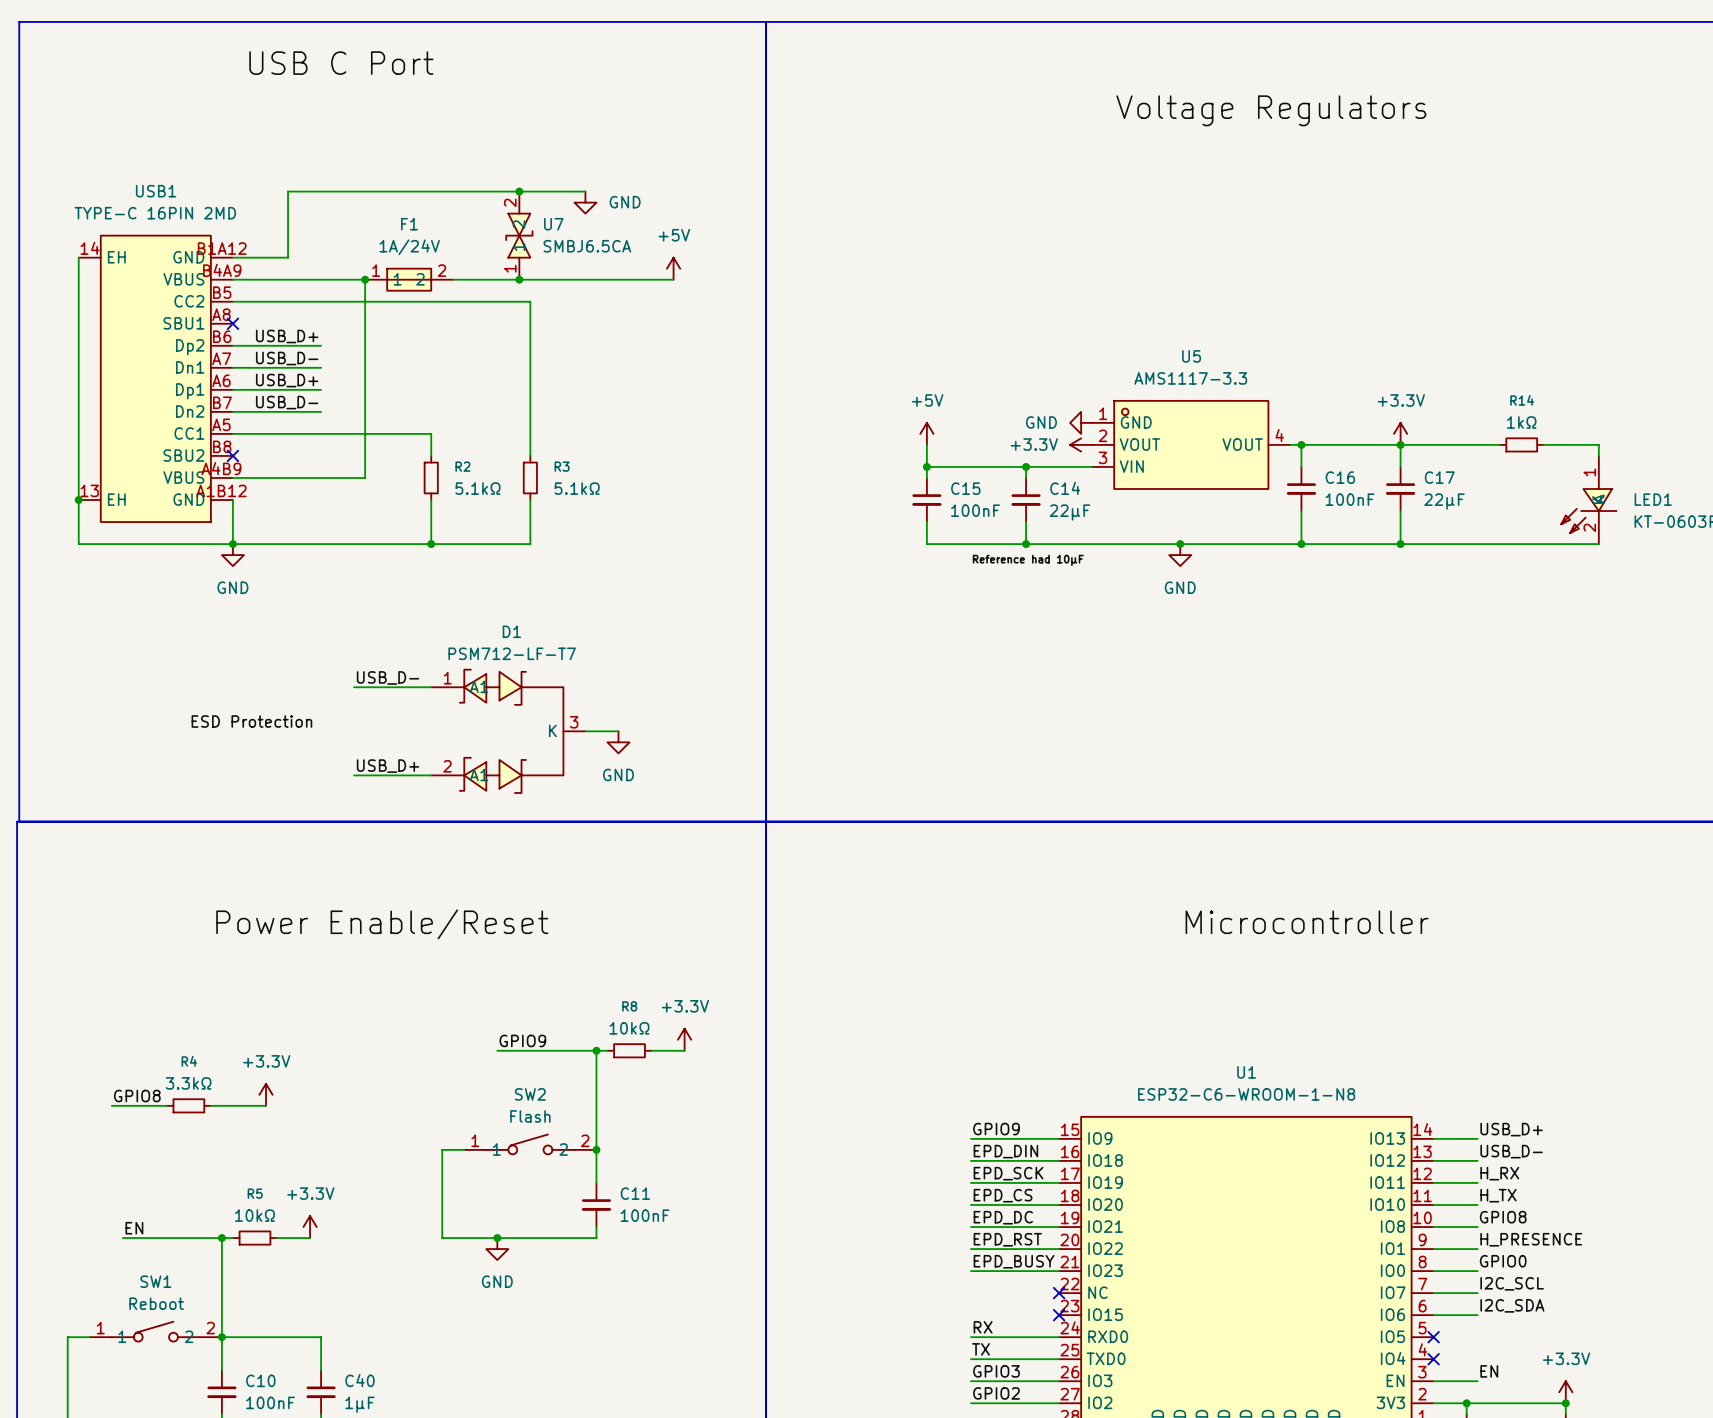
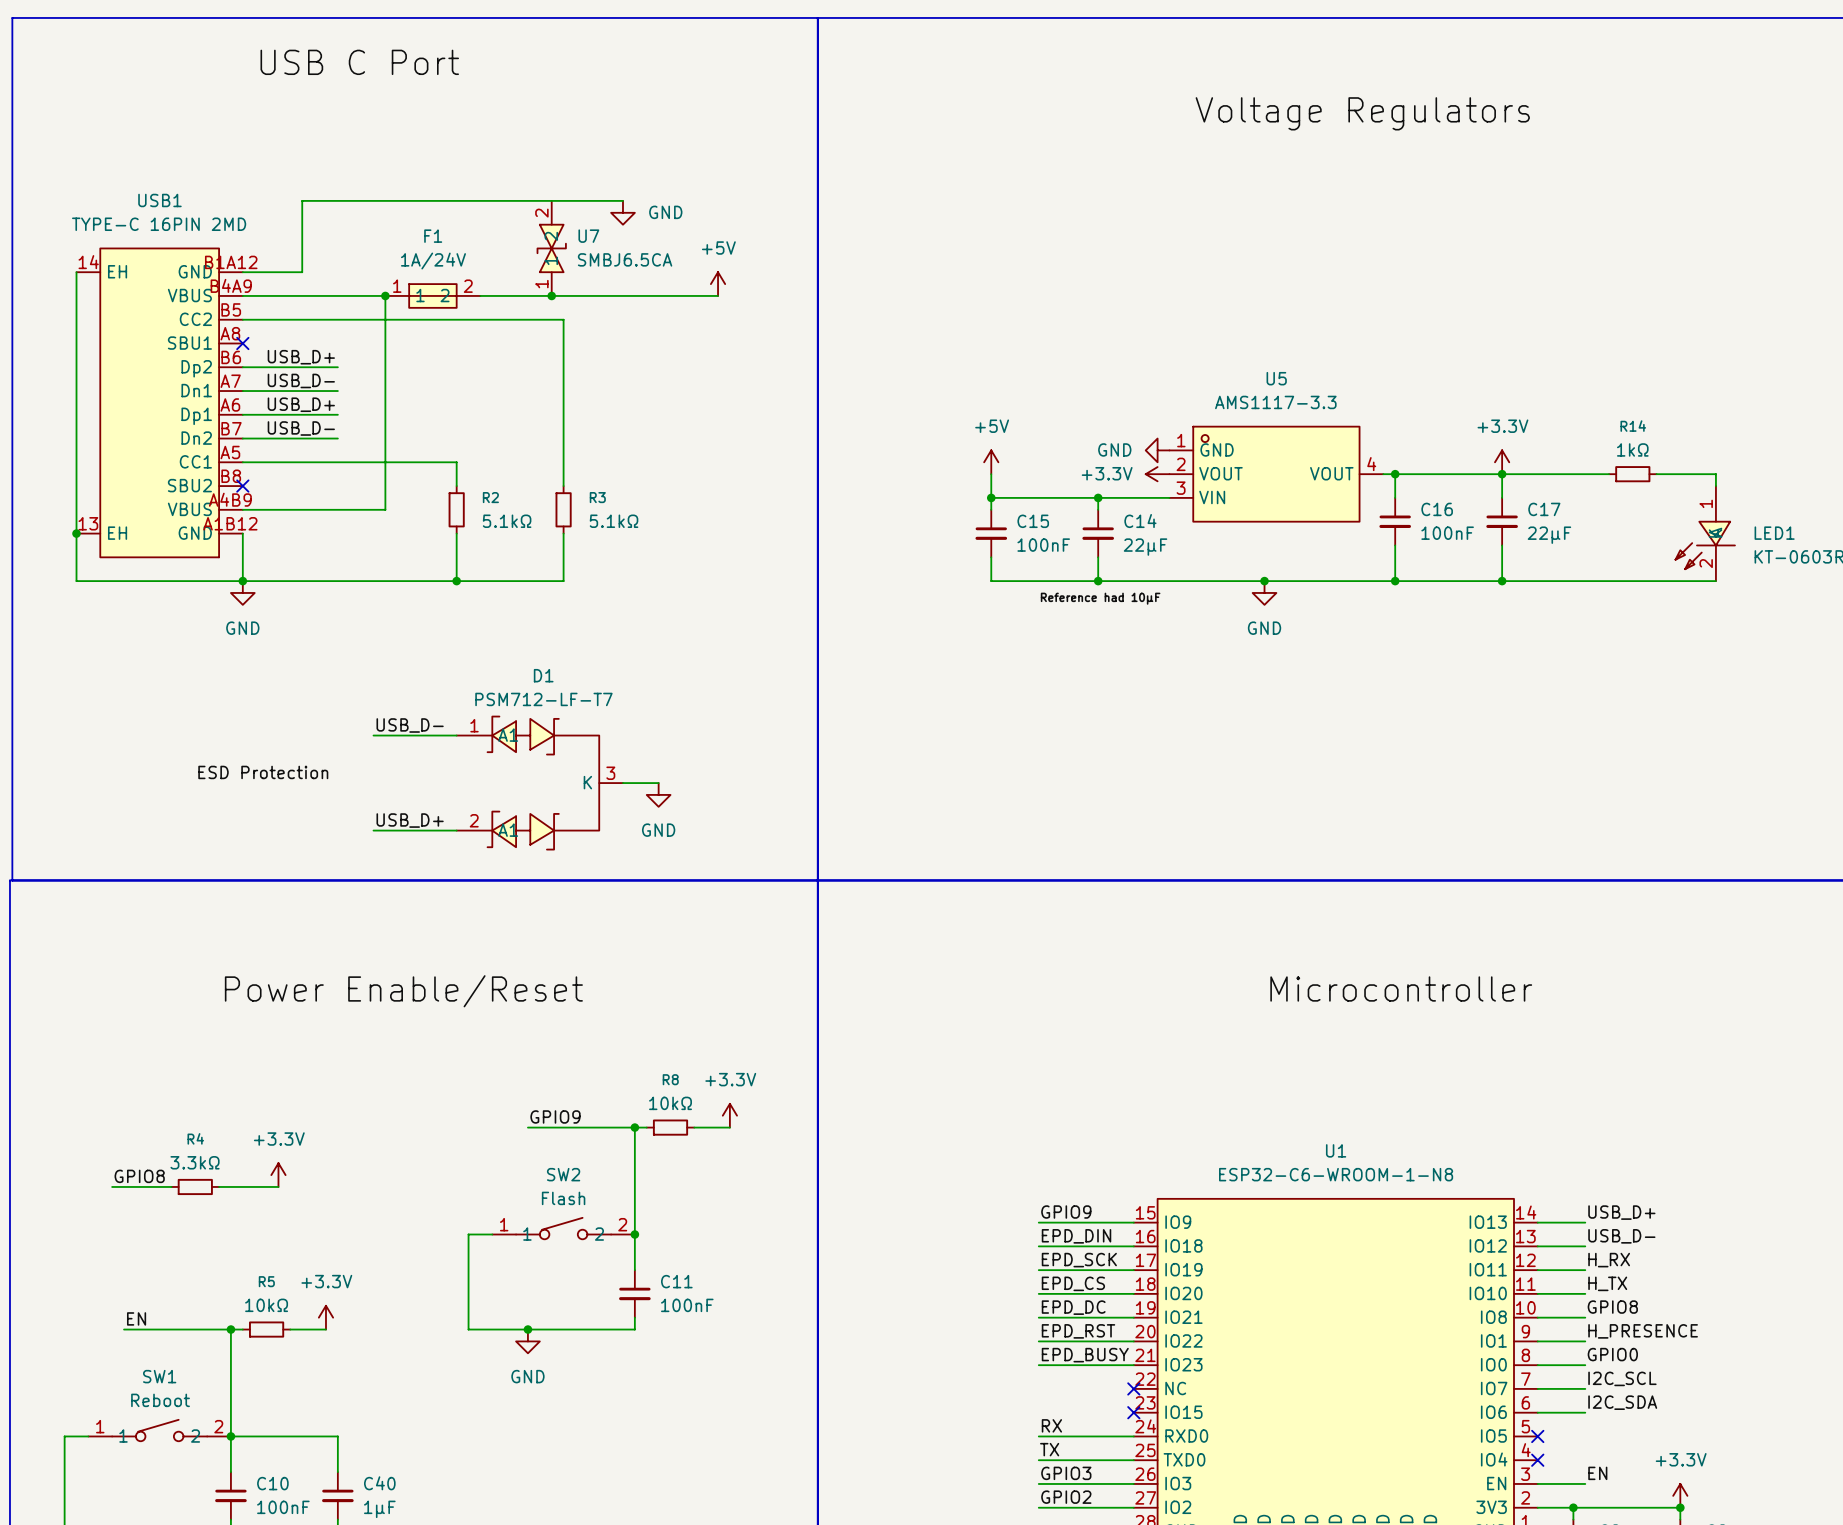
junction: (519, 191) -> none

